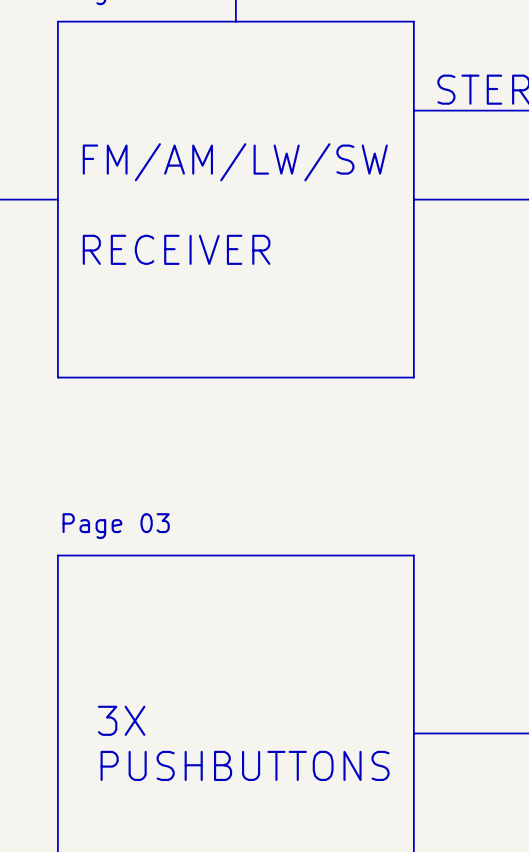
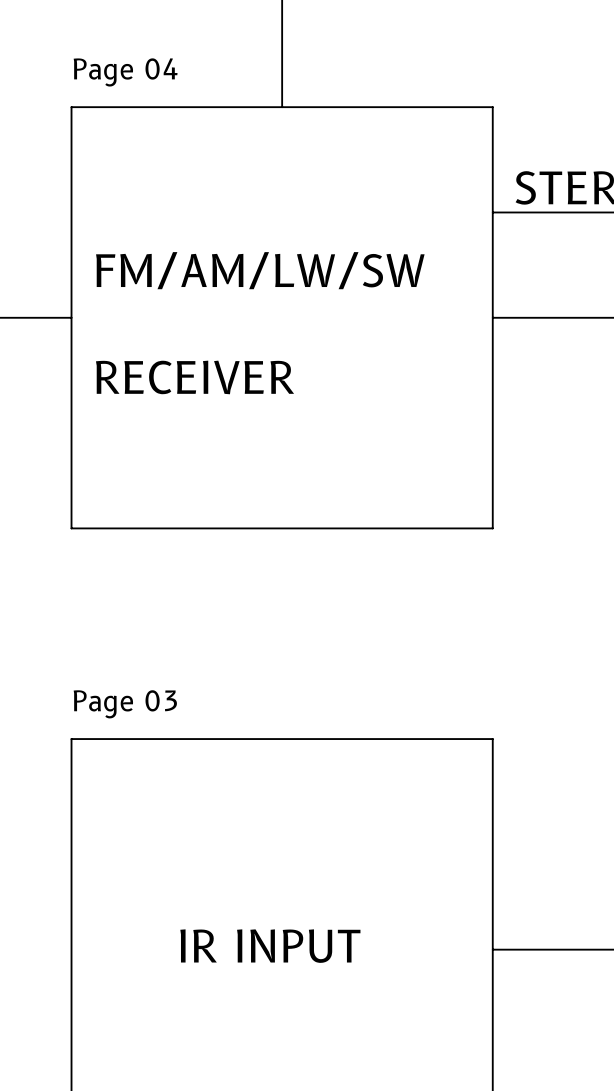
text: 3X (121, 720) -> none
text: none -> IR INPUT (270, 946)
text: PUSHBUTTONS (245, 765) -> none

